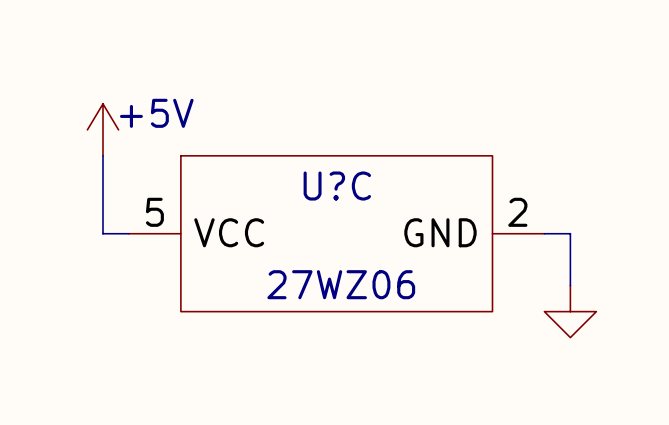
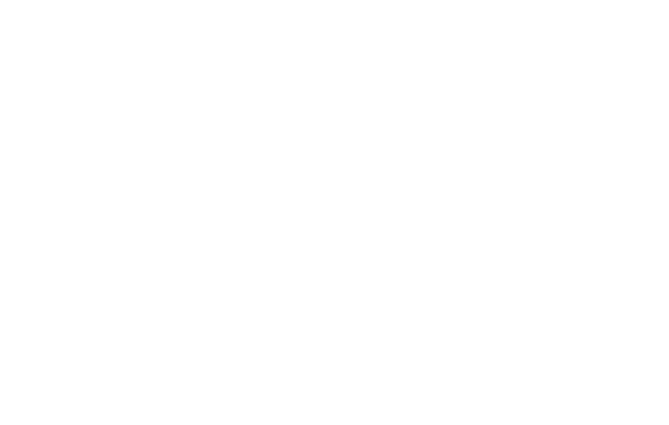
power symbol: +5V (102, 129) -> none
wire: (102, 155) (102, 233) (128, 233) -> none
U?C: 27WZ06 (336, 233) -> none
wire: (544, 233) (570, 233) (570, 285) -> none
power symbol: (570, 311) -> none

